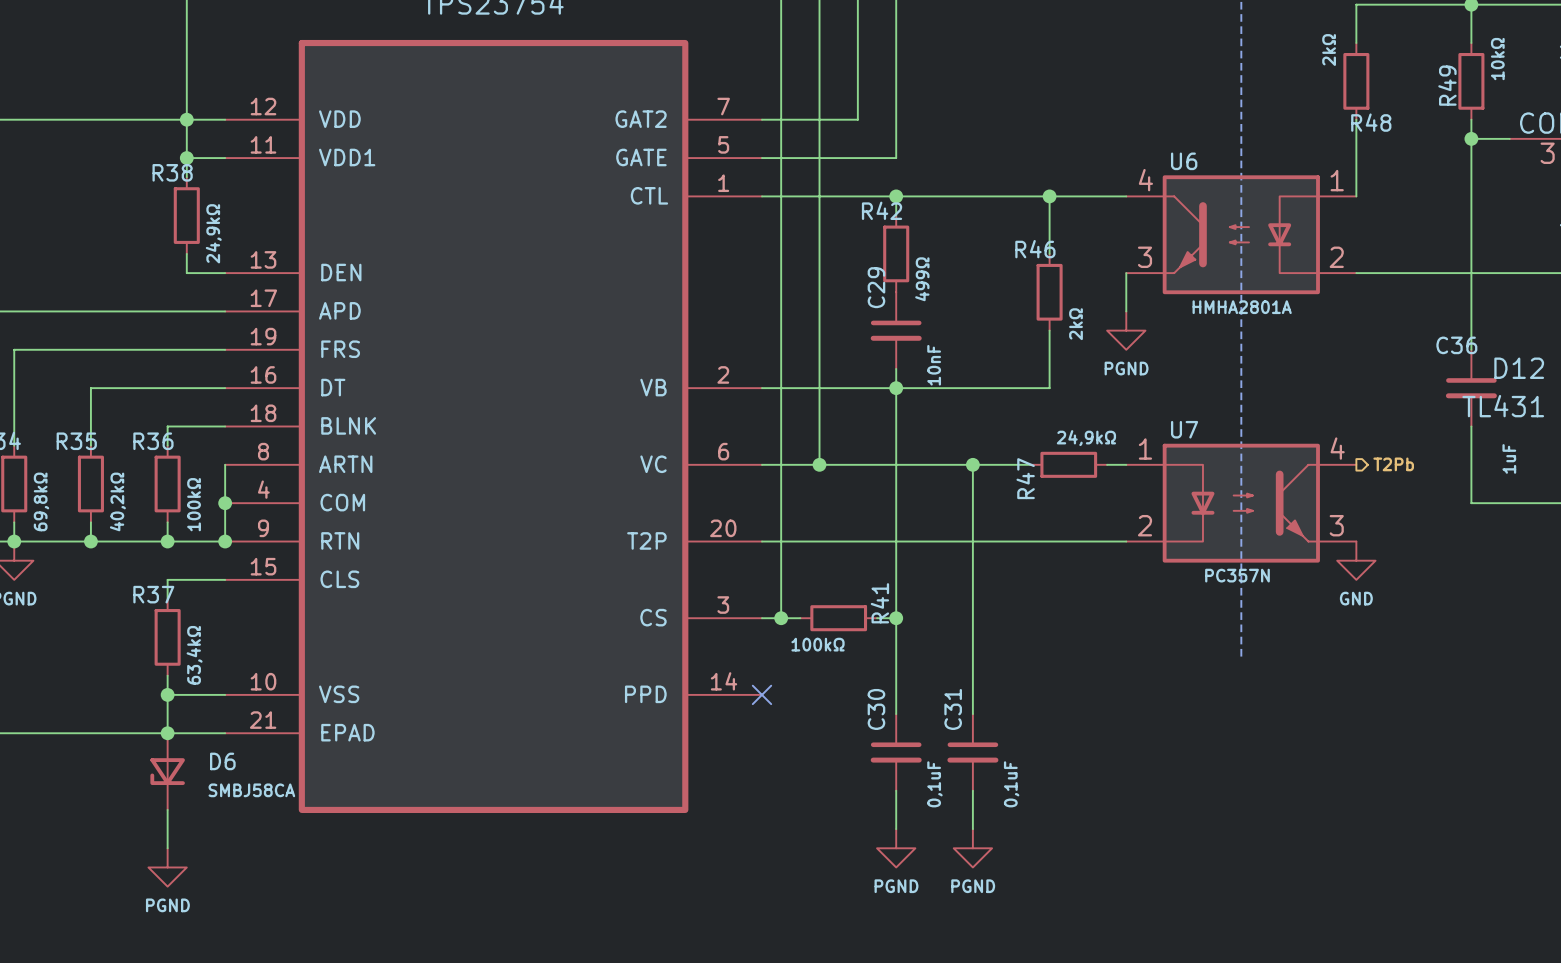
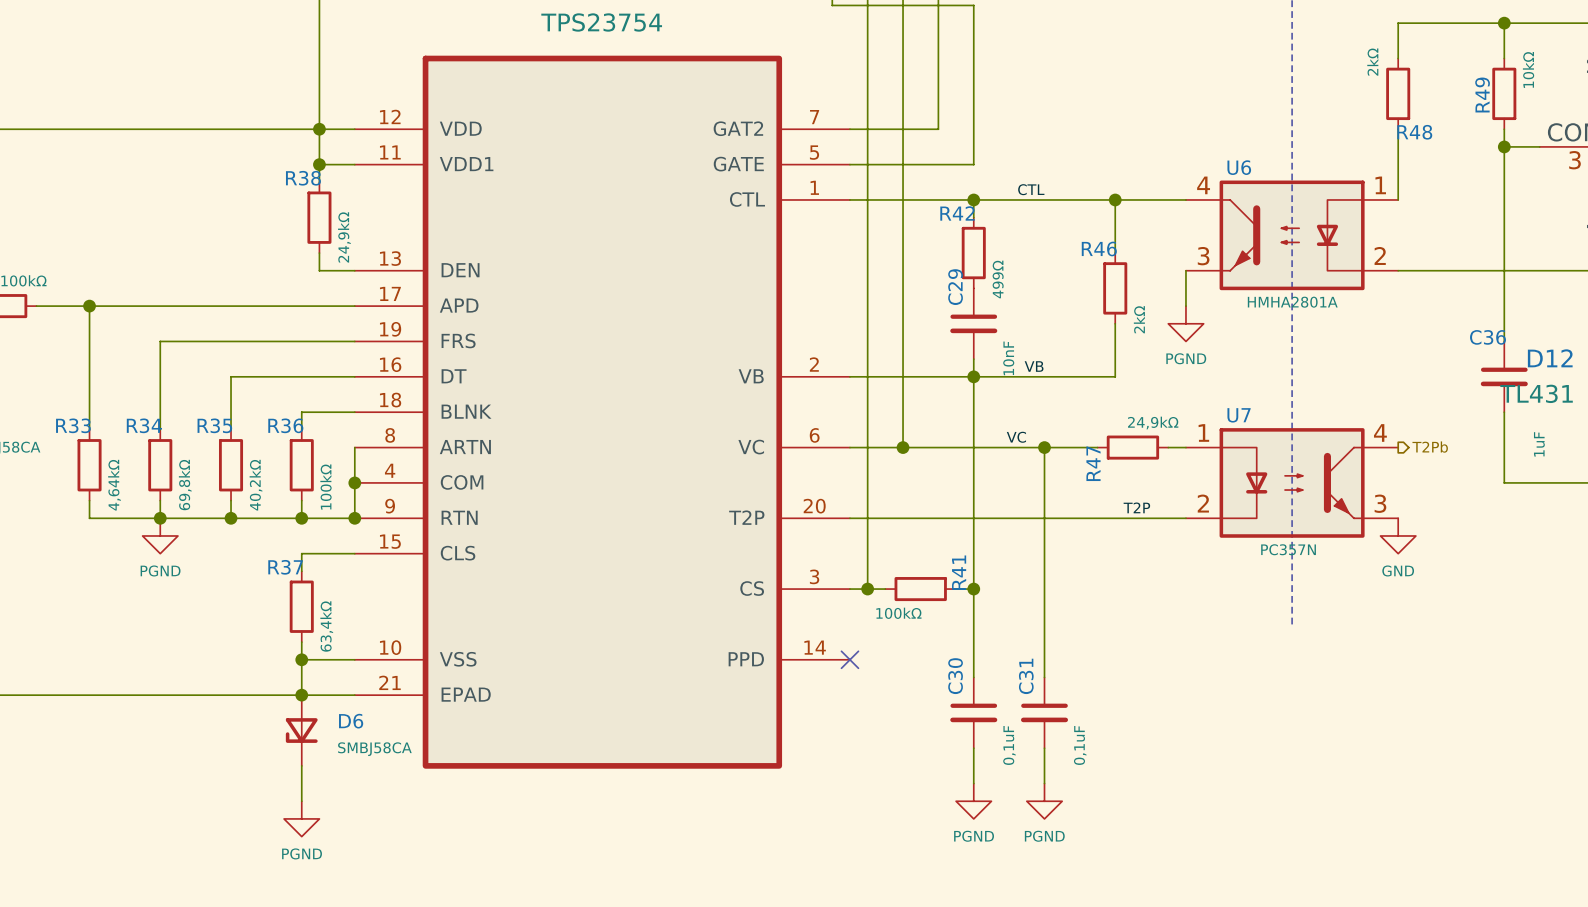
label: none -> CTL (1031, 189)
label: none -> VB (1034, 366)
label: none -> VC (1016, 437)
label: none -> T2P (1136, 507)

